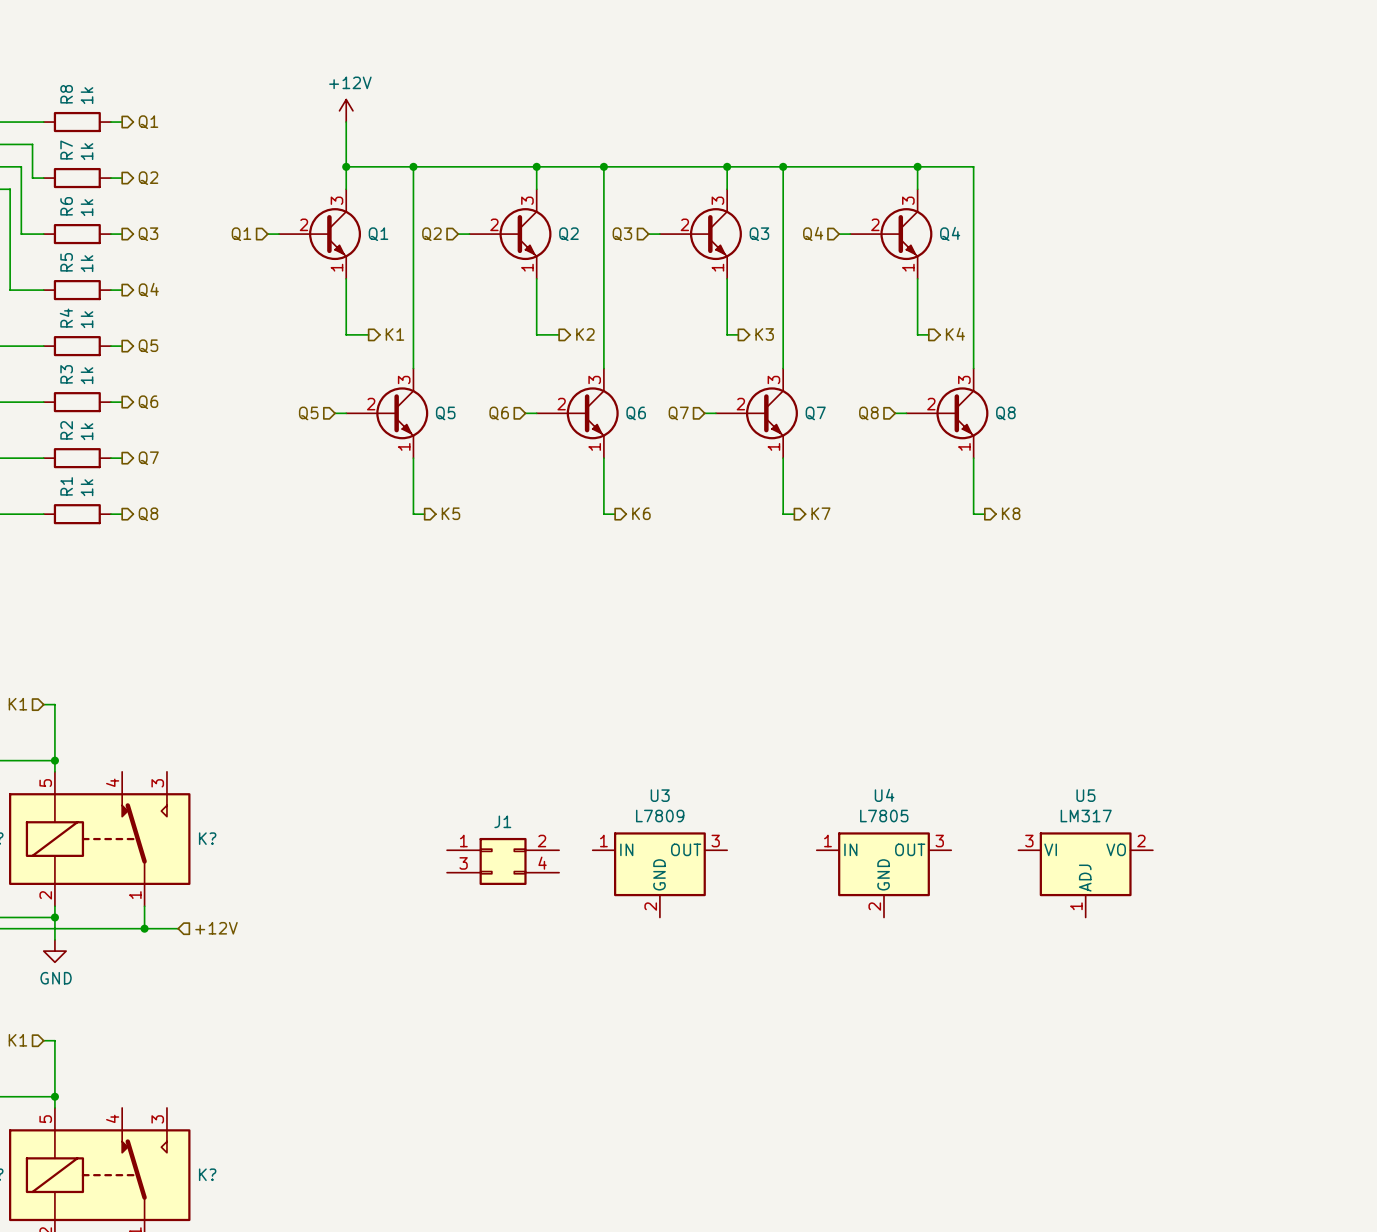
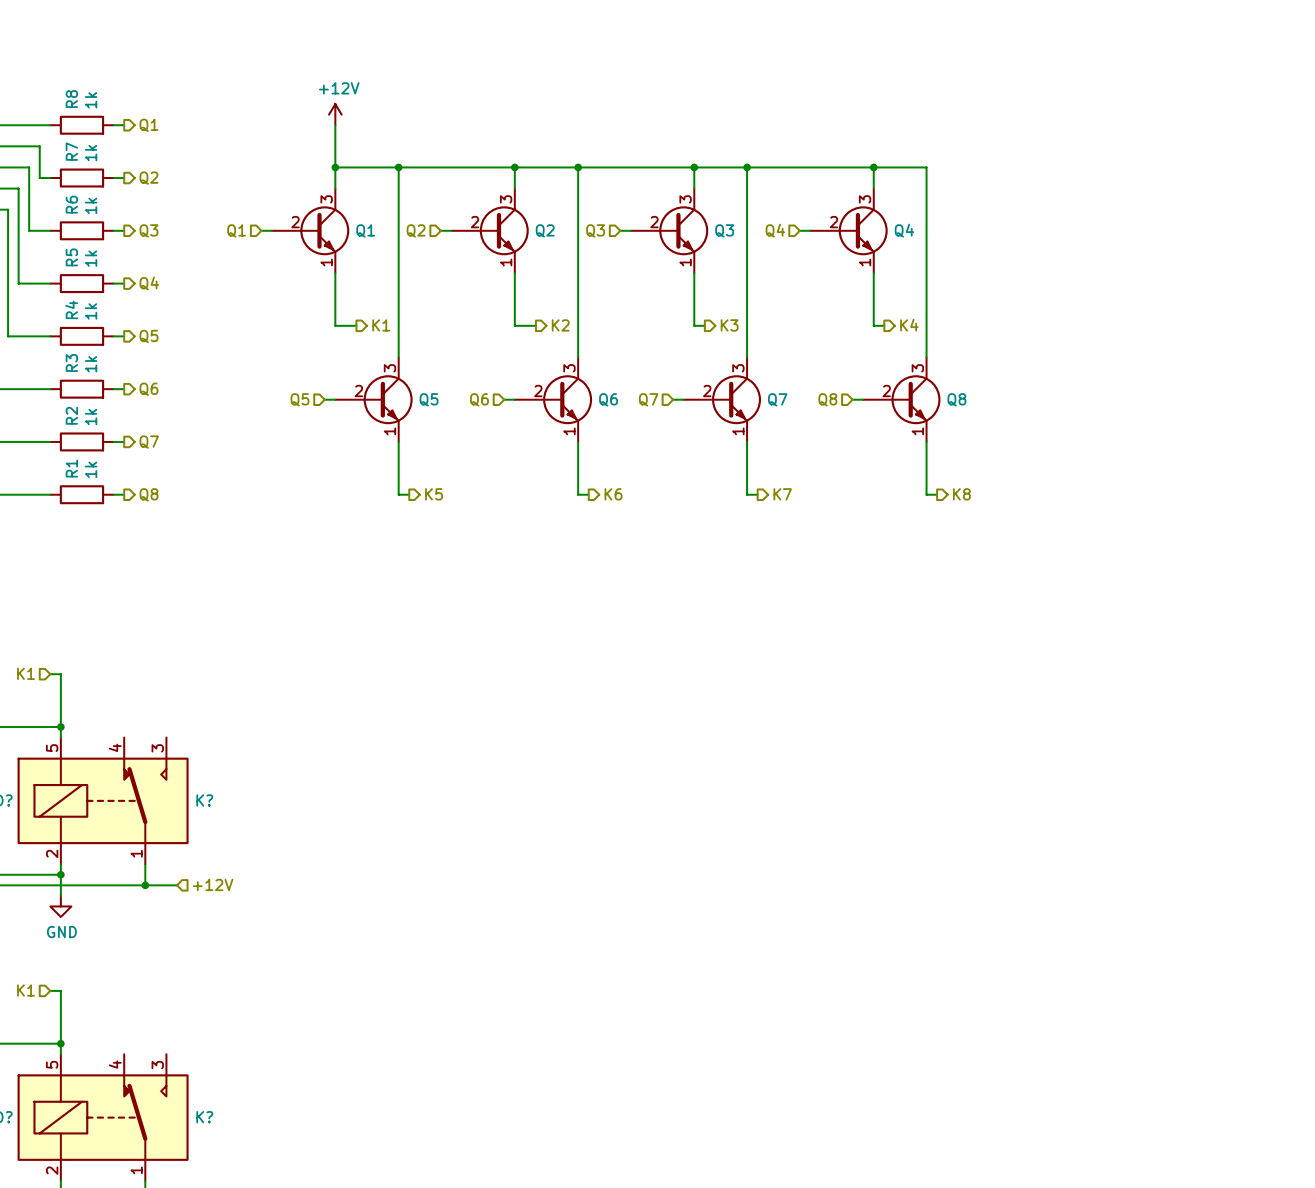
J1: (503, 861) -> none
U3: L7809 (659, 874) -> none
U4: L7805 (883, 874) -> none
U5: LM317 (1085, 874) -> none

